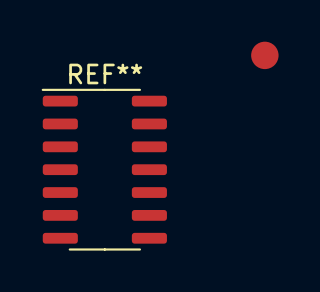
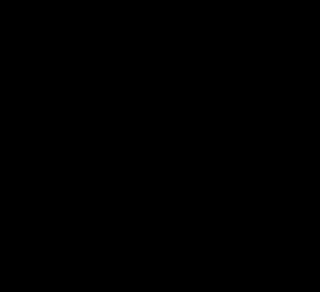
REF**: (160, 146) -> none

